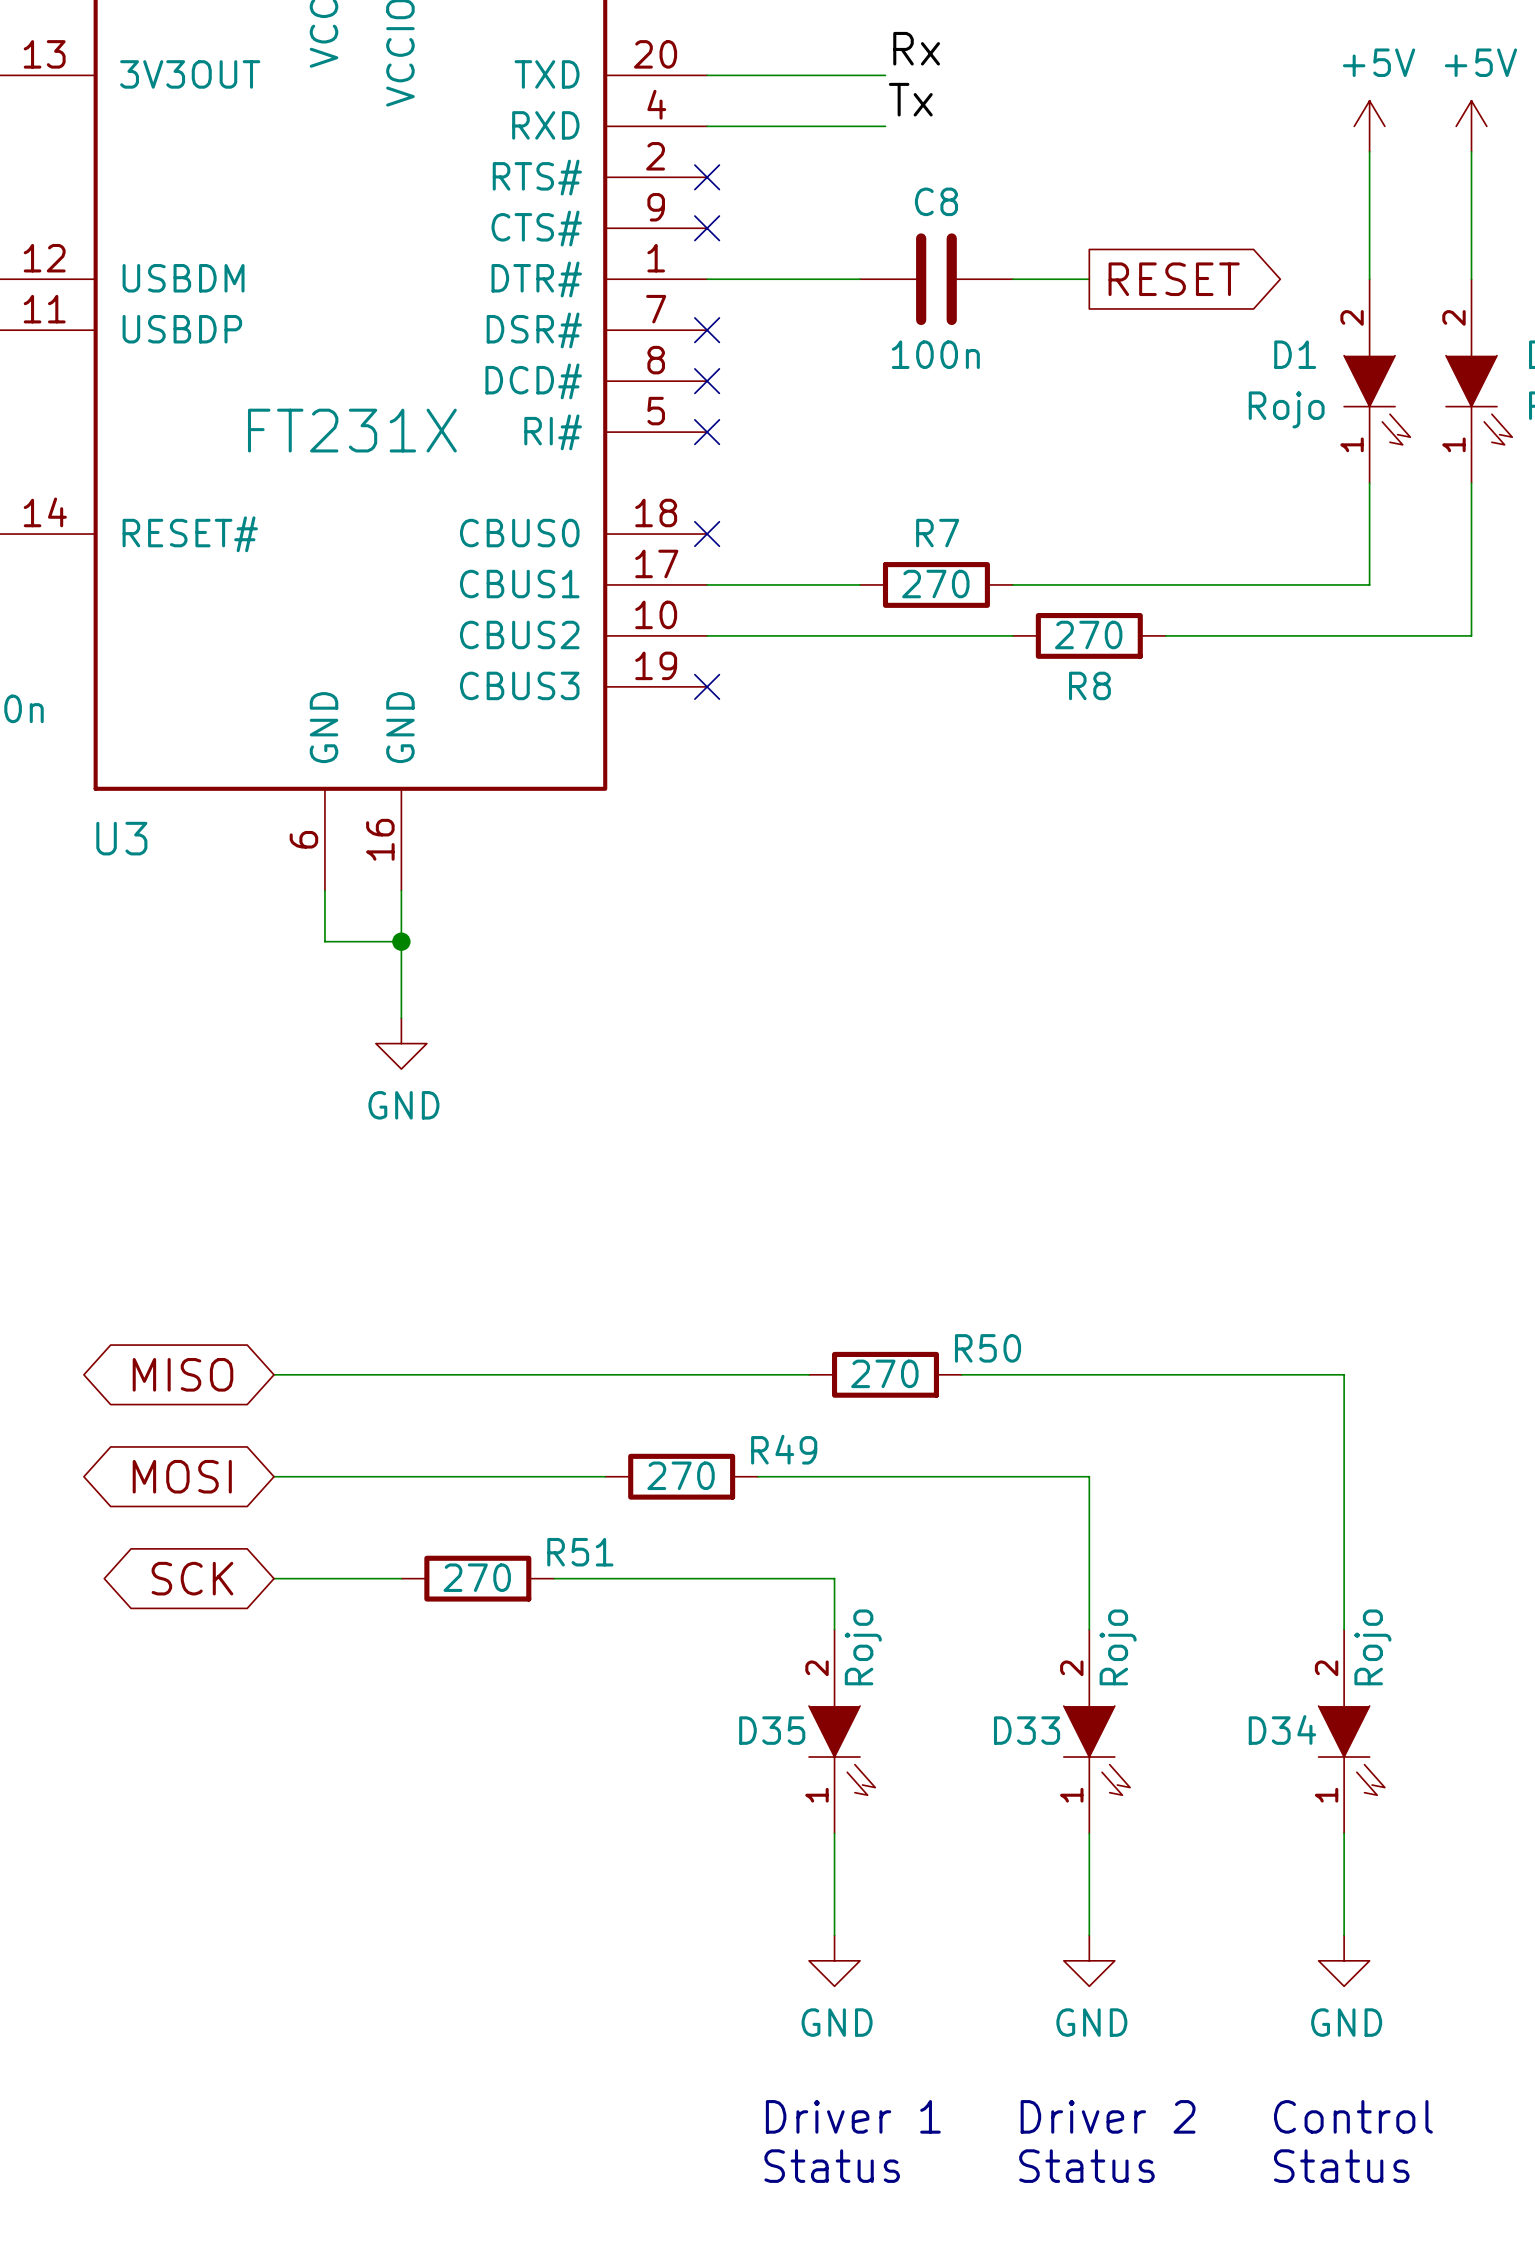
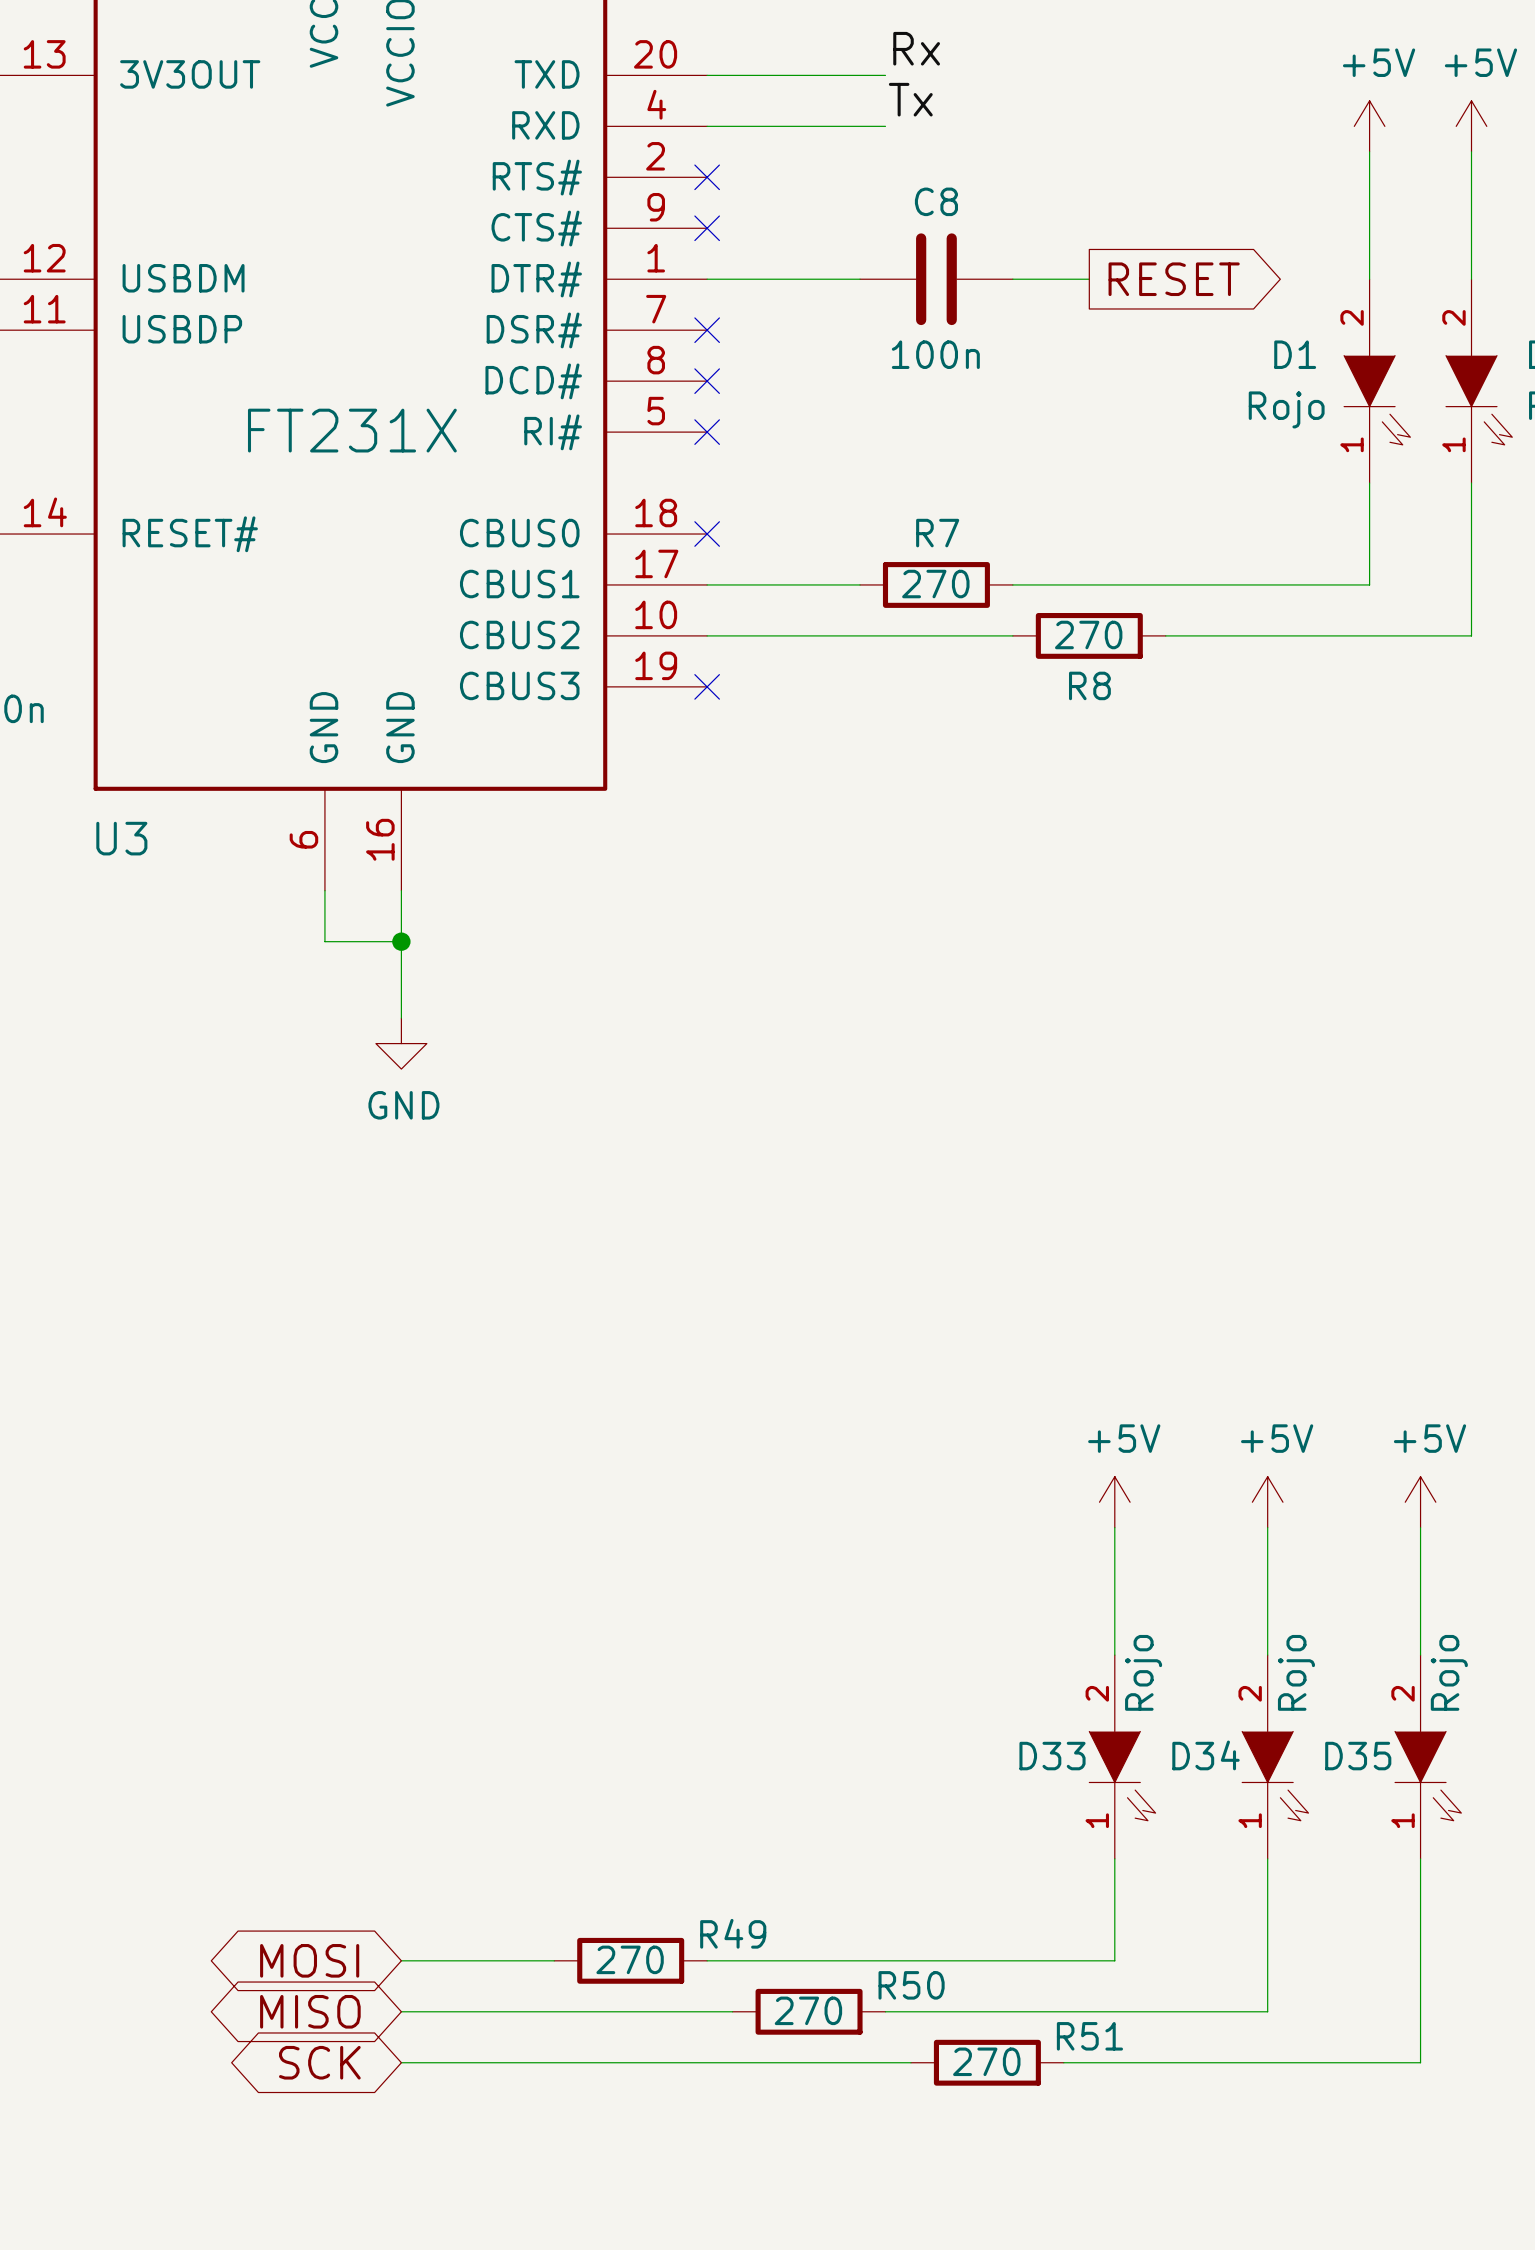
global label: MISO (182, 1374) -> none
wire: (273, 1374) (809, 1374) -> none
R50 position: (885, 1374) -> (809, 2011)
wire: (961, 1374) (1344, 1374) (1344, 1629) -> none
global label position: MOSI (182, 1476) -> MOSI (309, 1960)
wire: (273, 1476) (605, 1476) -> none
R49 position: (681, 1476) -> (630, 1960)
wire: (758, 1476) (1089, 1476) (1089, 1629) -> none
power symbol: none -> +5V (1114, 1502)
power symbol: none -> +5V (1267, 1502)
power symbol: none -> +5V (1420, 1502)
wire: none -> (1114, 1527) (1114, 1655)
wire: none -> (1267, 1527) (1267, 1655)
wire: none -> (1420, 1527) (1420, 1655)
global label position: SCK (192, 1578) -> SCK (319, 2062)
wire: (273, 1578) (401, 1578) -> none
R51 position: (477, 1578) -> (987, 2062)
wire: (554, 1578) (834, 1578) (834, 1629) -> none
D35 position: (842, 1731) -> (1428, 1757)
D33 position: (1096, 1731) -> (1122, 1757)
D34 position: (1351, 1731) -> (1275, 1757)
wire: (834, 1833) (834, 1935) -> none
wire: (1089, 1833) (1089, 1935) -> none
wire: (1344, 1833) (1344, 1935) -> none
wire: none -> (1114, 1858) (1114, 1960) (707, 1960)
wire: none -> (1267, 1858) (1267, 2011) (885, 2011)
wire: none -> (1420, 1858) (1420, 2062) (1063, 2062)
wire: none -> (401, 1960) (554, 1960)
power symbol: GND (834, 1960) -> none
power symbol: GND (1089, 1960) -> none
power symbol: GND (1344, 1960) -> none
global label: none -> MISO (310, 2011)
wire: none -> (401, 2011) (732, 2011)
wire: none -> (401, 2062) (910, 2062)
text: Driver 1 (853, 2116) -> none
text: Driver 2 (1108, 2116) -> none
text: Control (1353, 2116) -> none
text: Status (832, 2166) -> none
text: Status (1086, 2166) -> none
text: Status (1341, 2166) -> none

